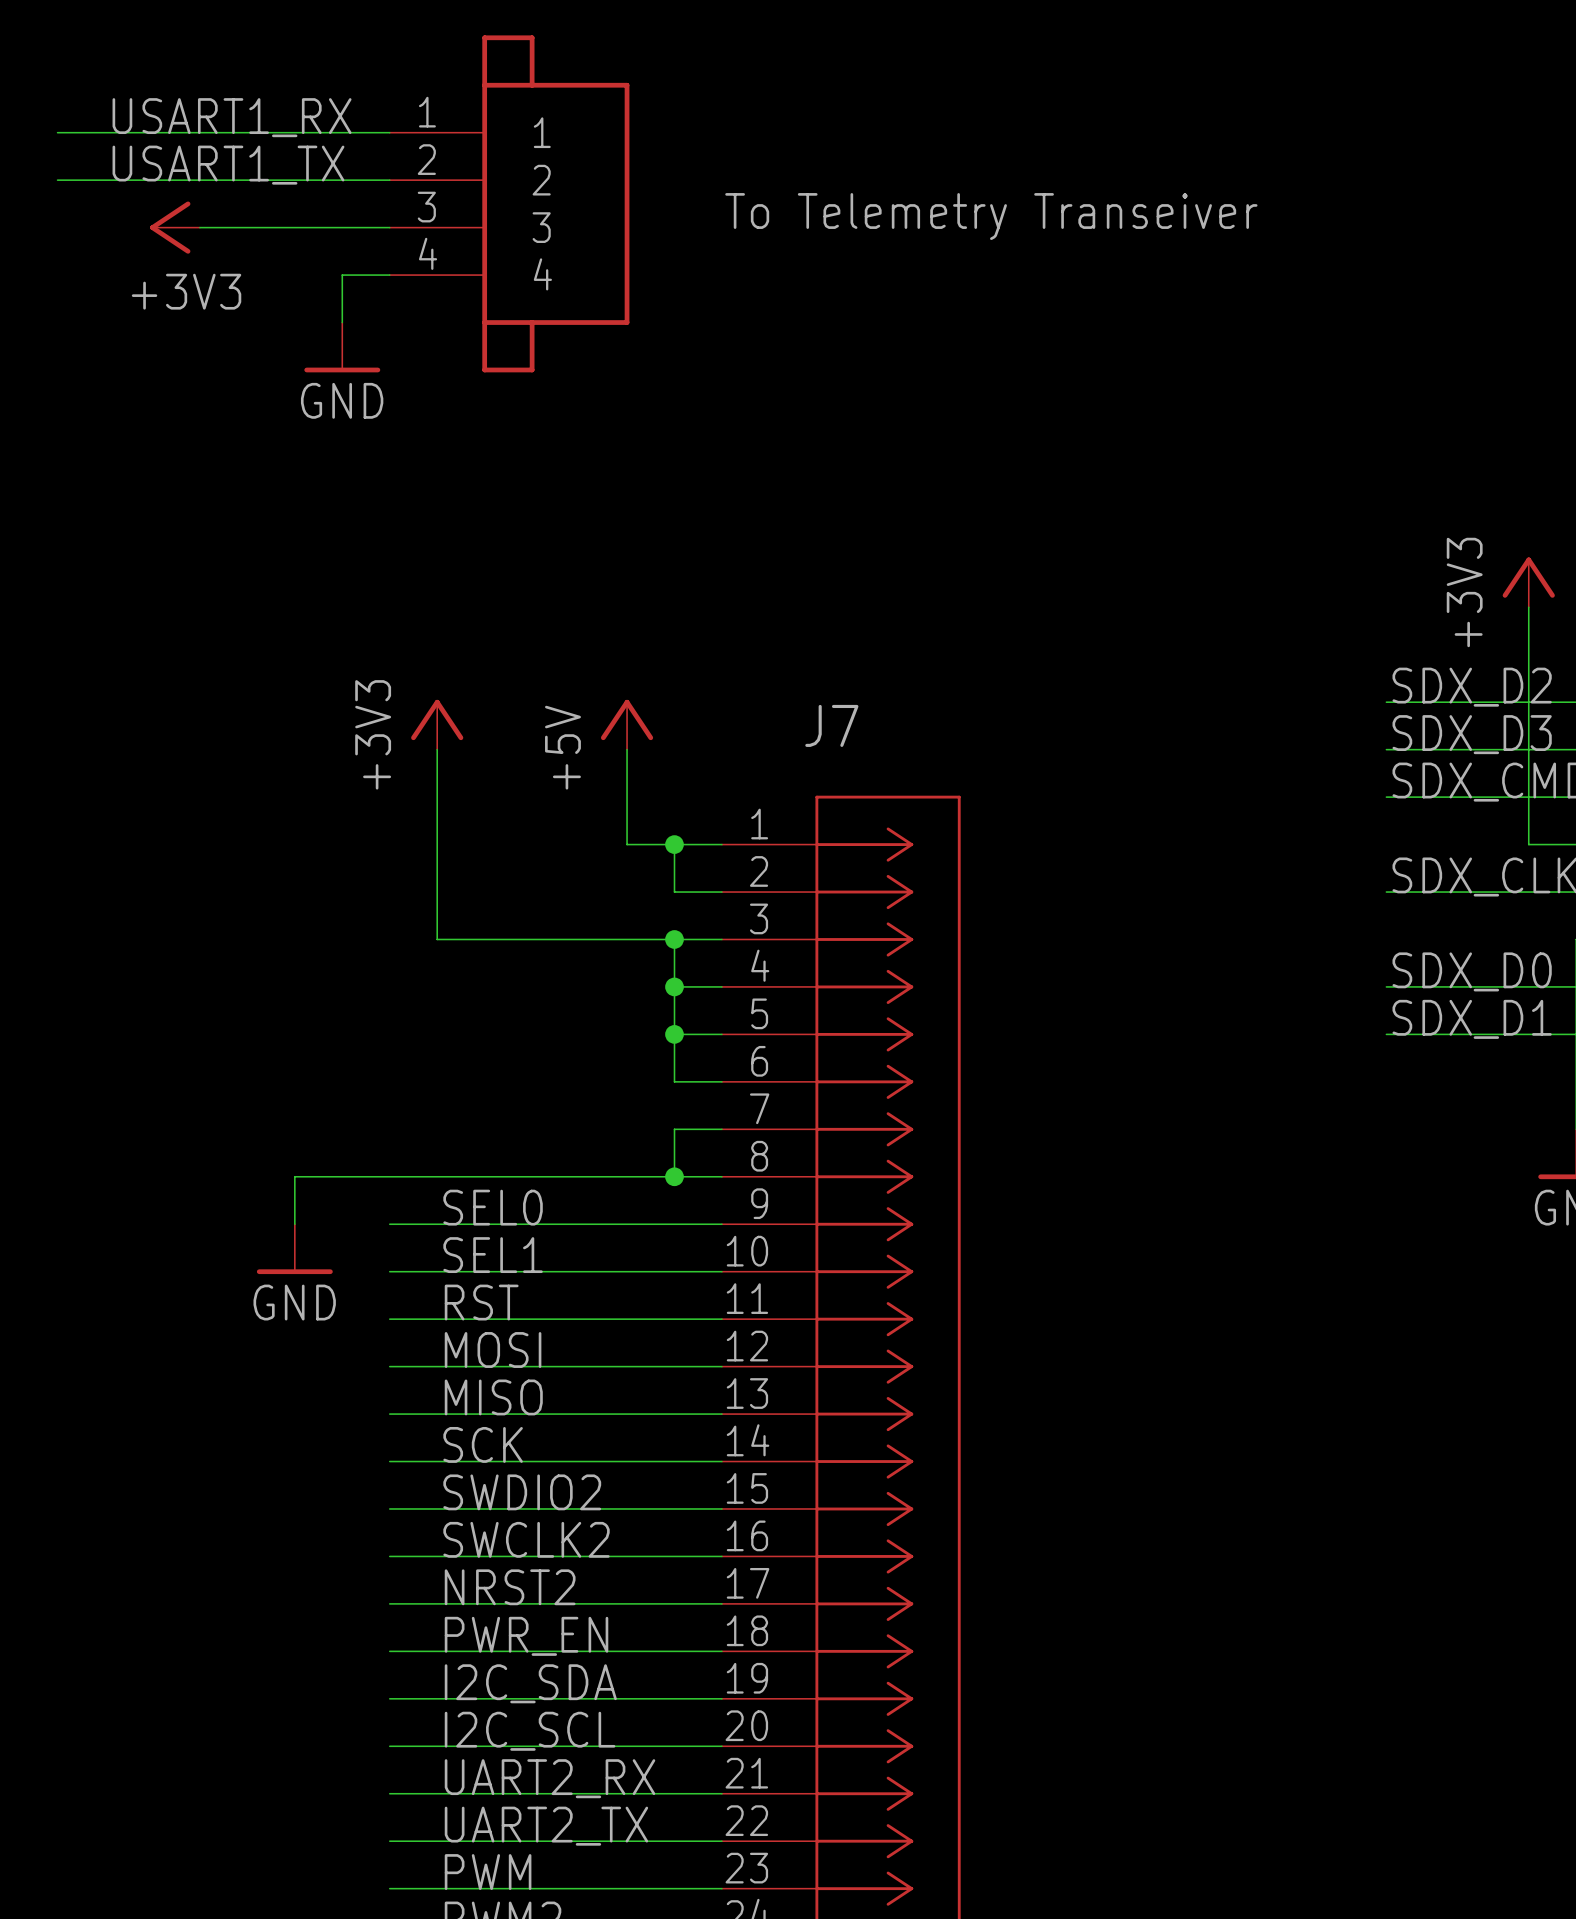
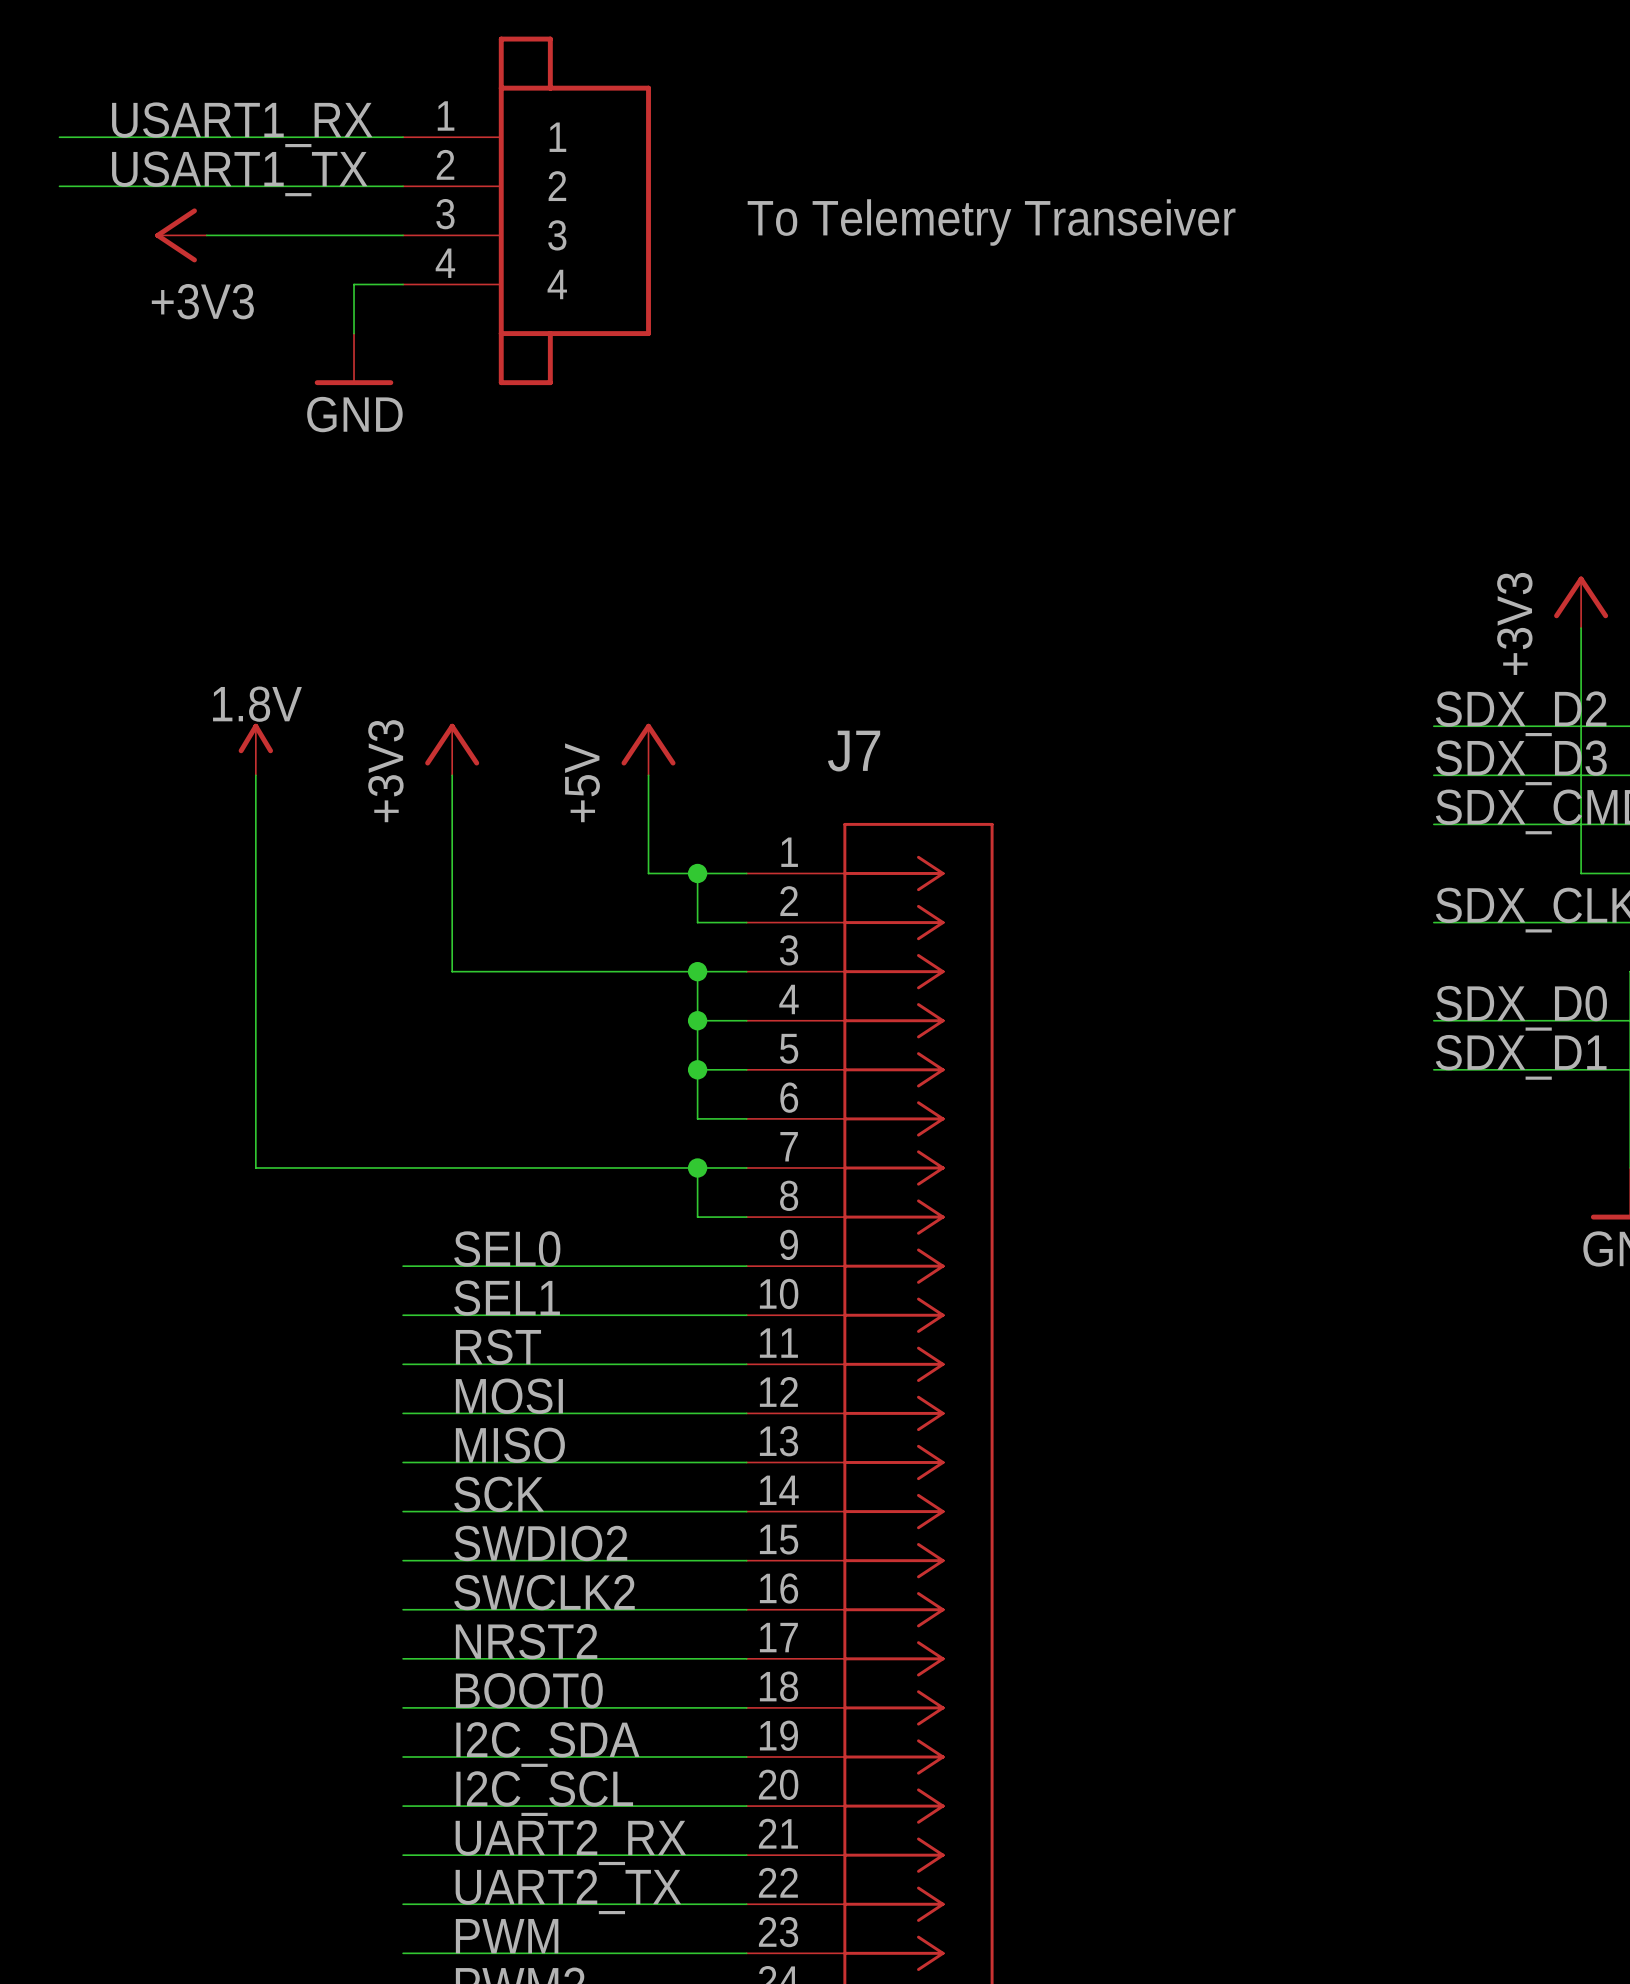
power symbol: none -> 1.8V (255, 749)
wire: none -> (255, 775) (255, 1167) (697, 1167)
wire: (674, 1176) (294, 1176) (294, 1224) -> none
junction position: (674, 1176) -> (697, 1167)
power symbol: GND (294, 1249) -> none
label: PWR_EN (526, 1636) -> BOOT0 (529, 1690)

